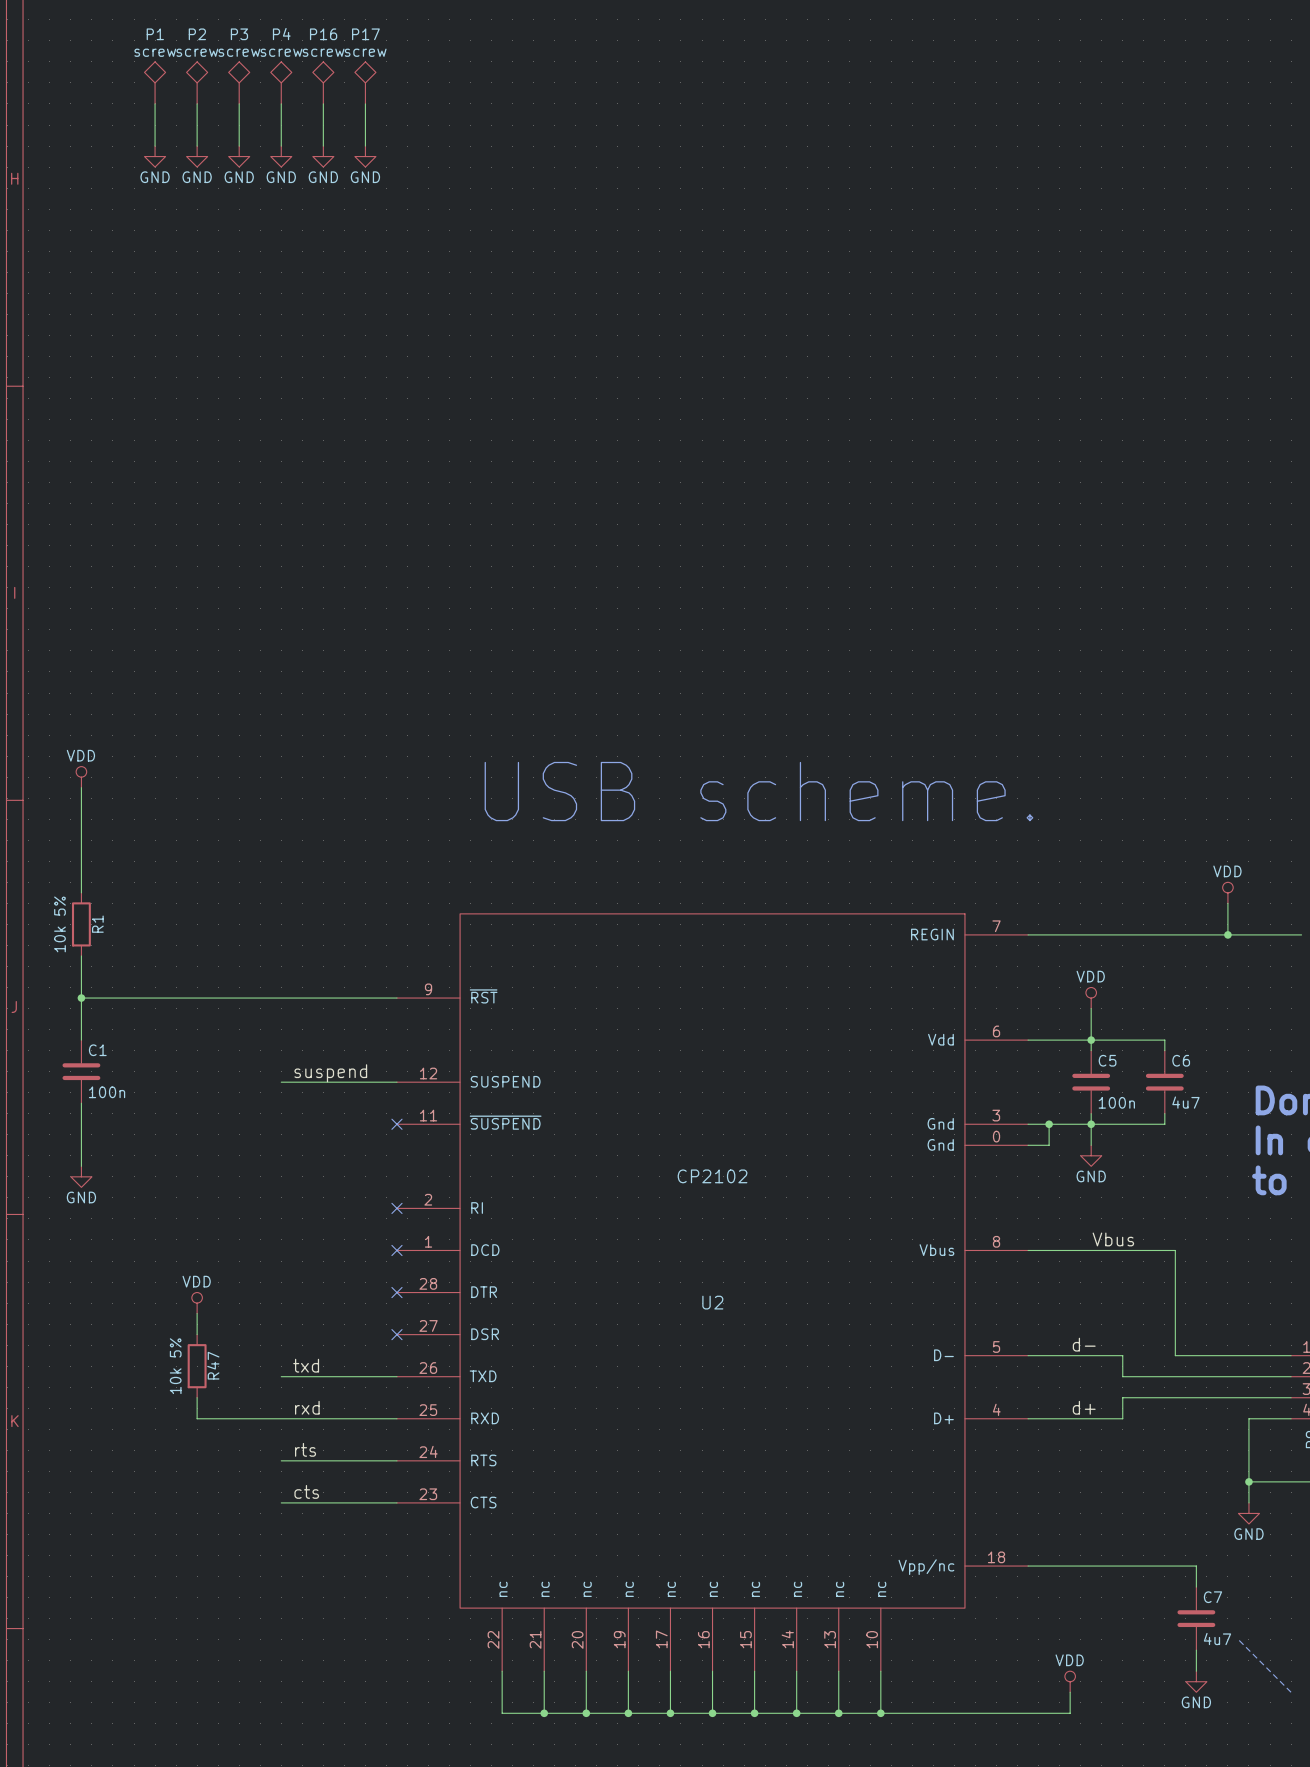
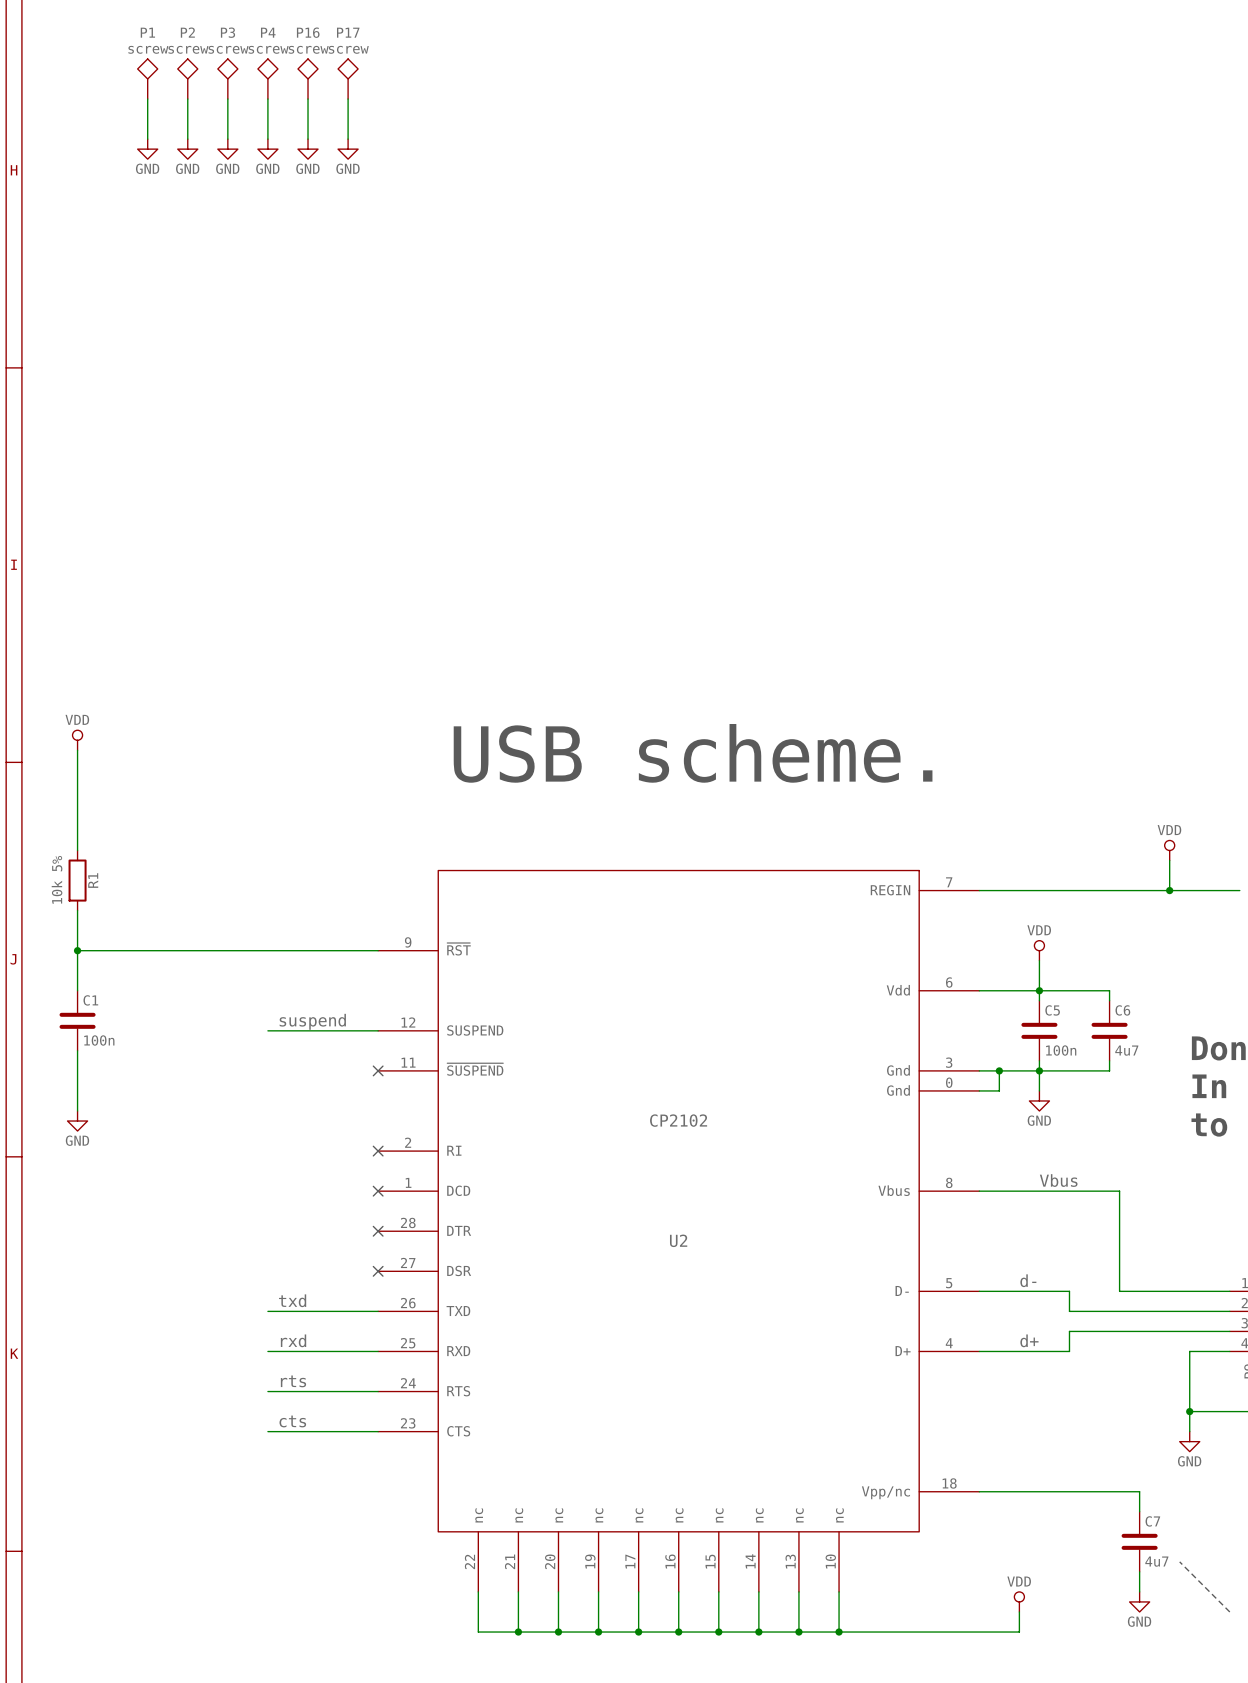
power symbol: VDD (197, 1303) -> none
wire: (197, 1313) (197, 1334) -> none
R47: 10k 5% (197, 1366) -> none
wire: (197, 1397) (197, 1418) (281, 1418) -> none

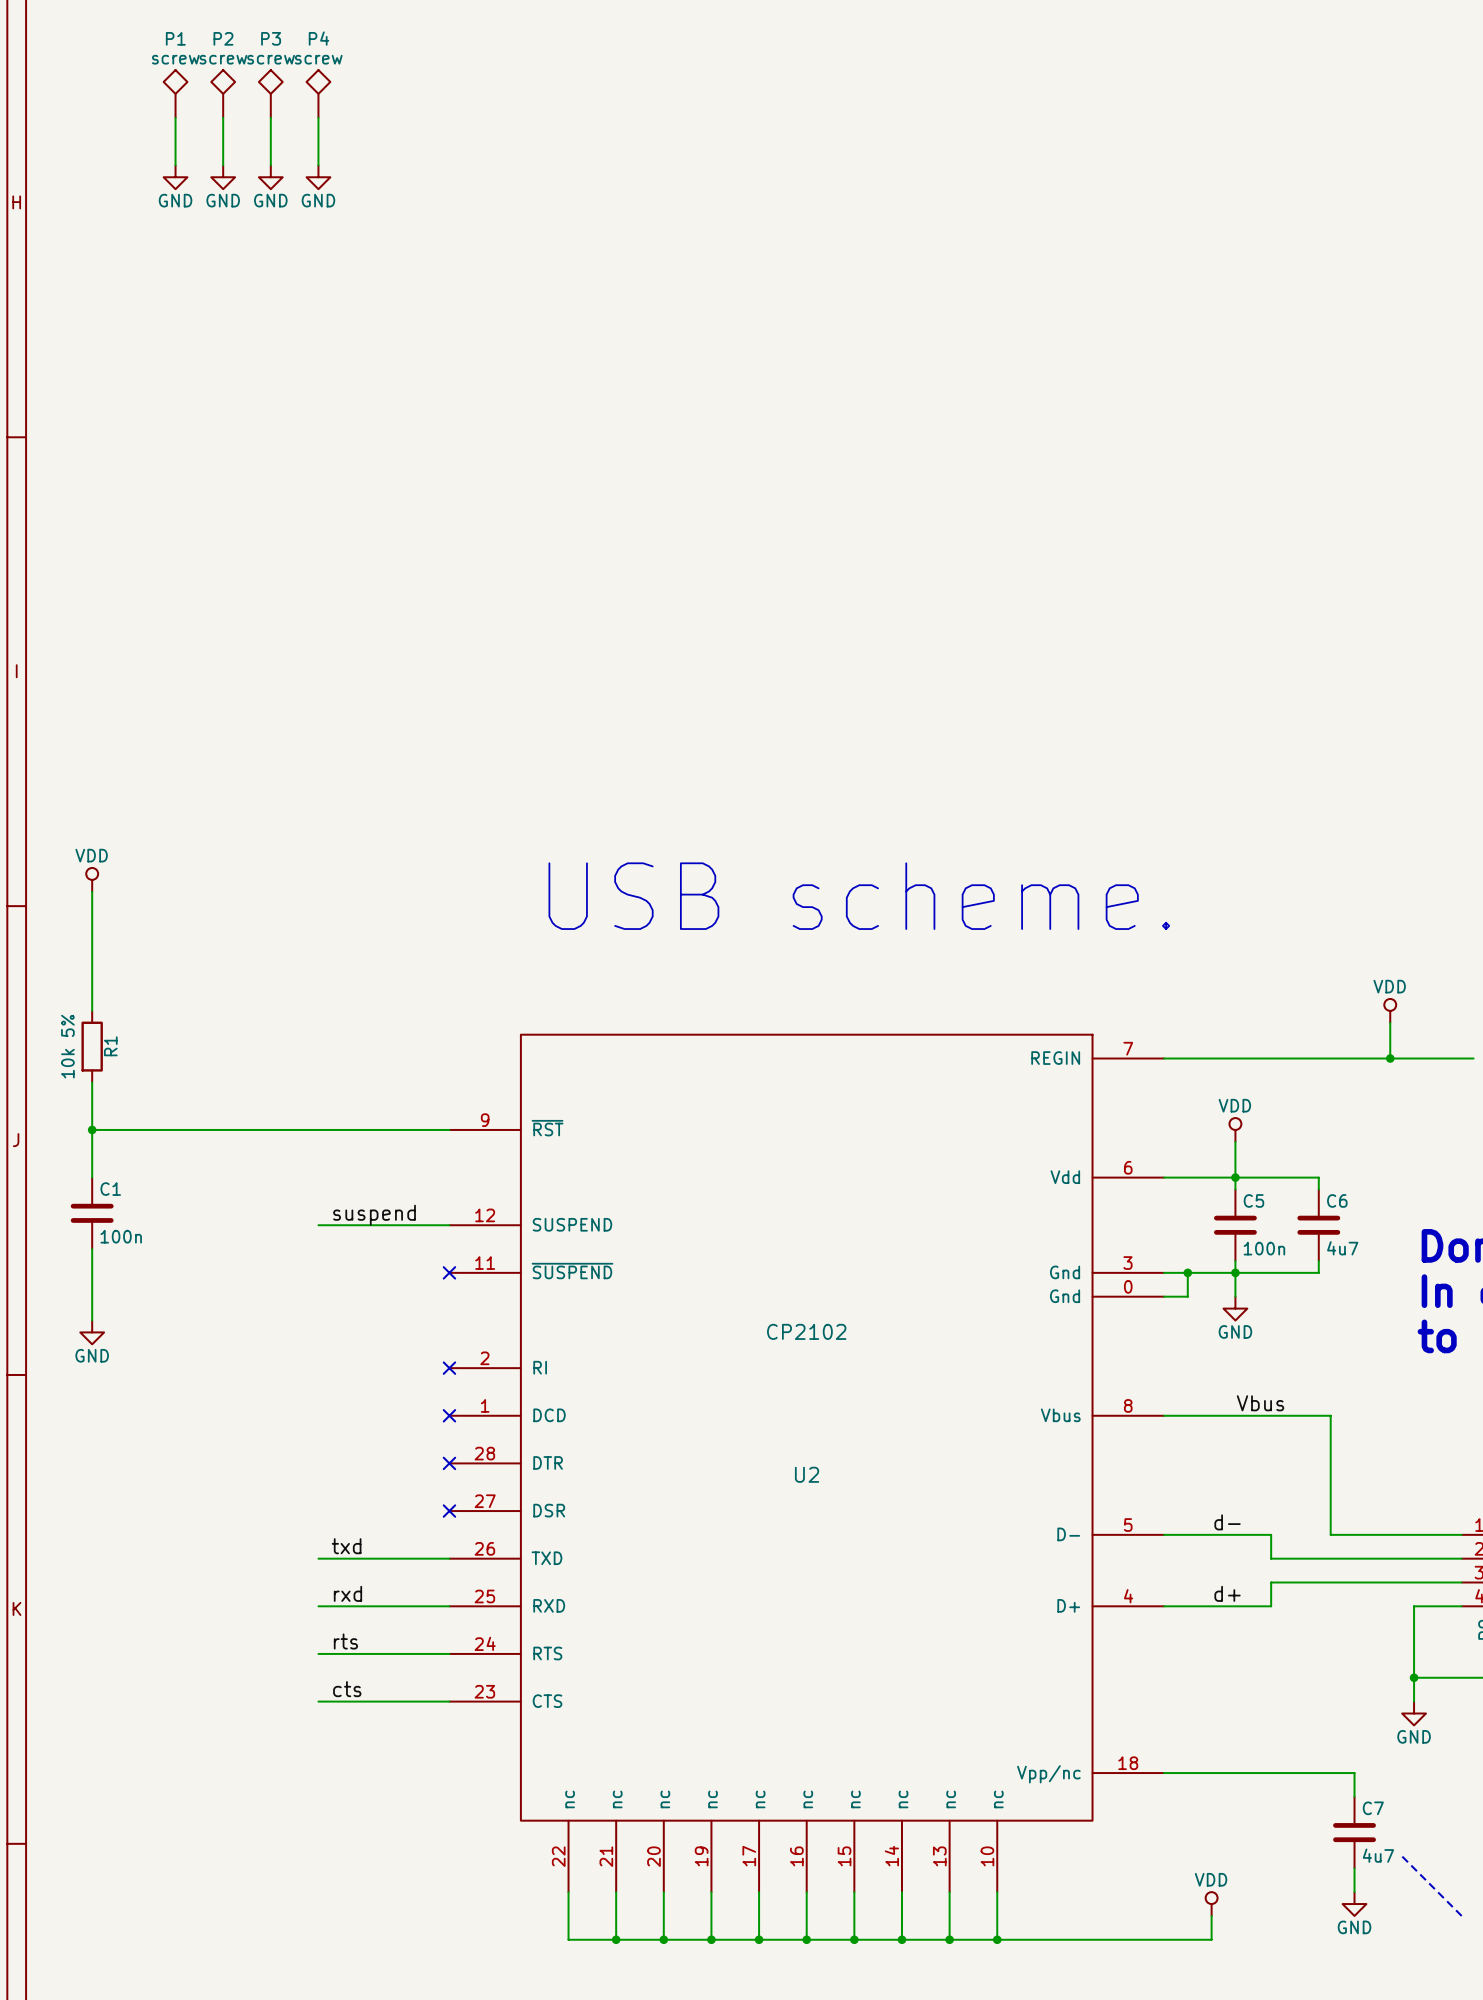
P16: screw (308, 78) -> none
P17: screw (348, 78) -> none
wire: (308, 99) (308, 139) -> none
wire: (348, 99) (348, 139) -> none
power symbol: GND (308, 149) -> none
power symbol: GND (348, 149) -> none

